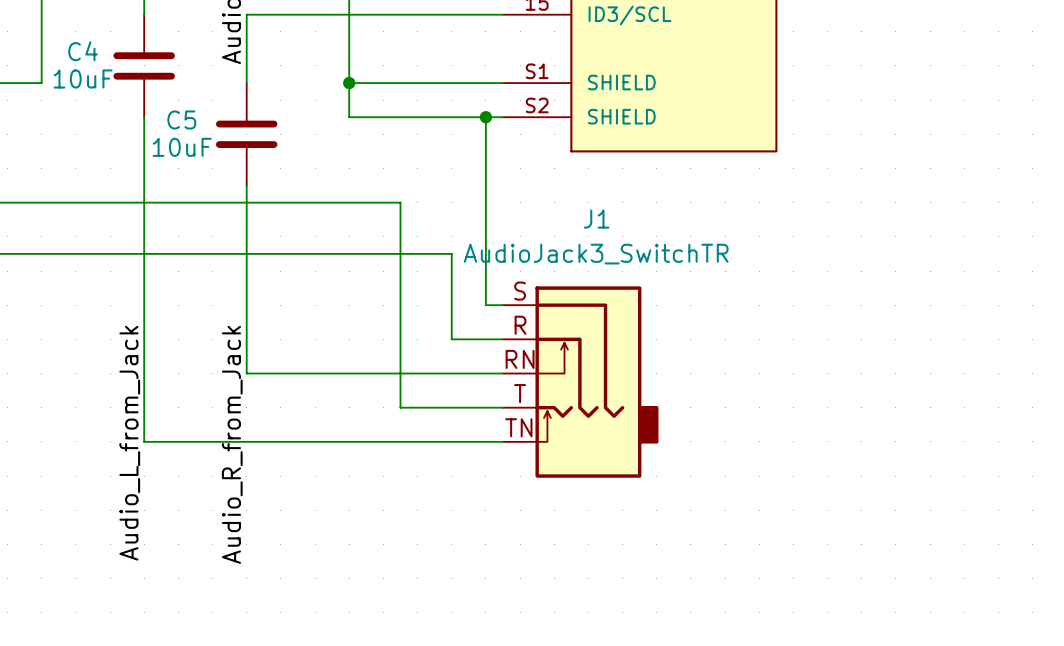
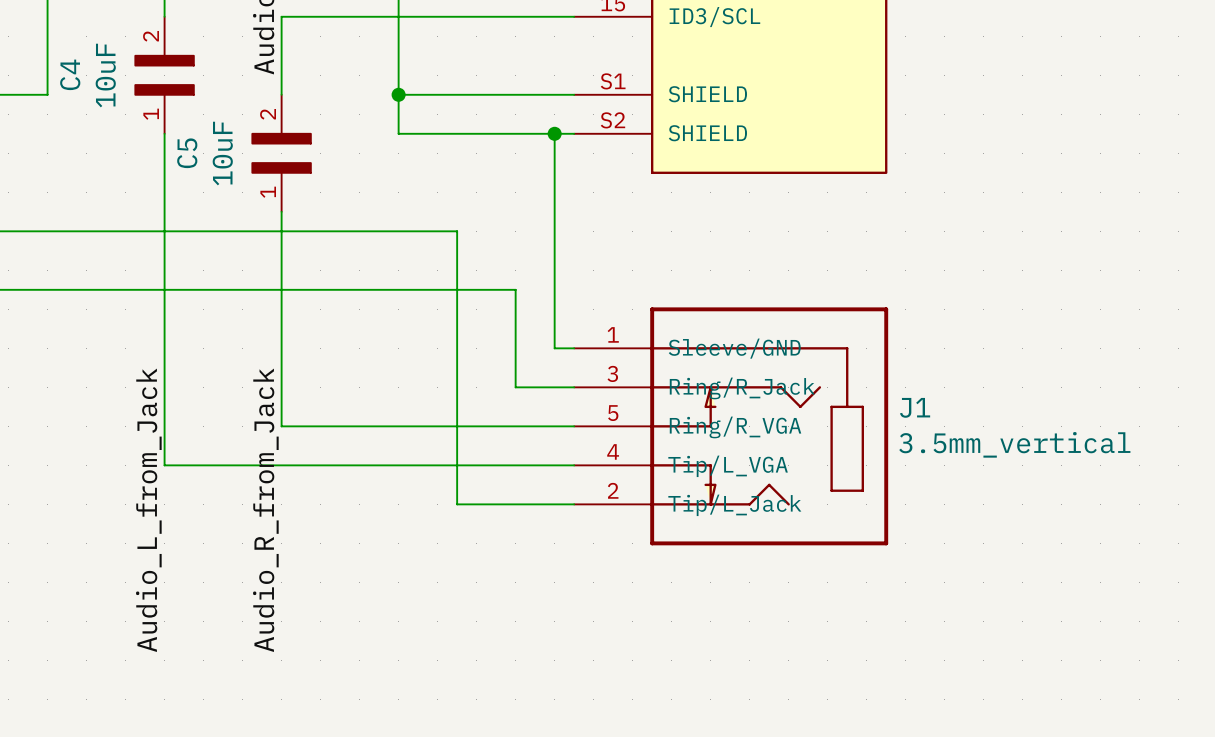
C4 symbol: [113, 14, 175, 118] -> [135, 16, 194, 134]
C5 symbol: [215, 83, 278, 186] -> [252, 94, 311, 212]
J1 name position: J1 (596, 219) -> J1 (915, 407)
J1 value: AudioJack3_SwitchTR (596, 254) -> 3.5mm_vertical (1014, 444)
J1 symbol: [503, 286, 659, 478] -> [574, 307, 889, 546]
wire: (144, 407) (144, 441) (400, 441) -> (164, 465) (457, 465) (457, 504)

